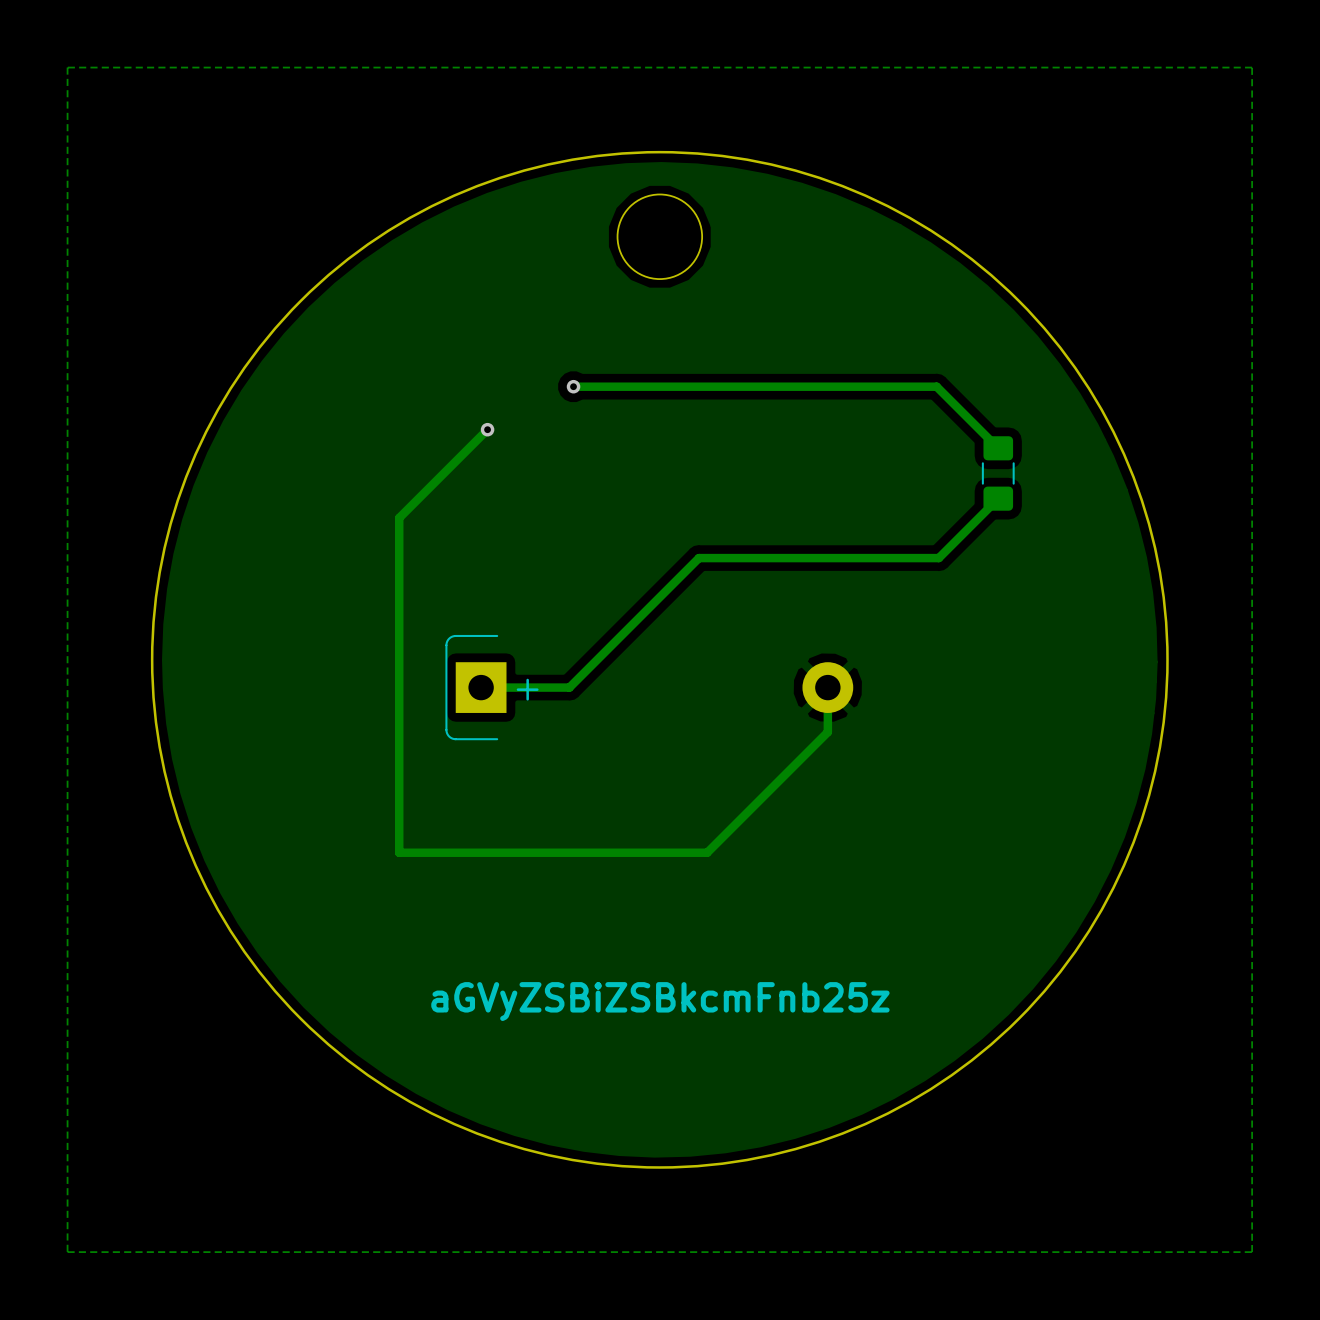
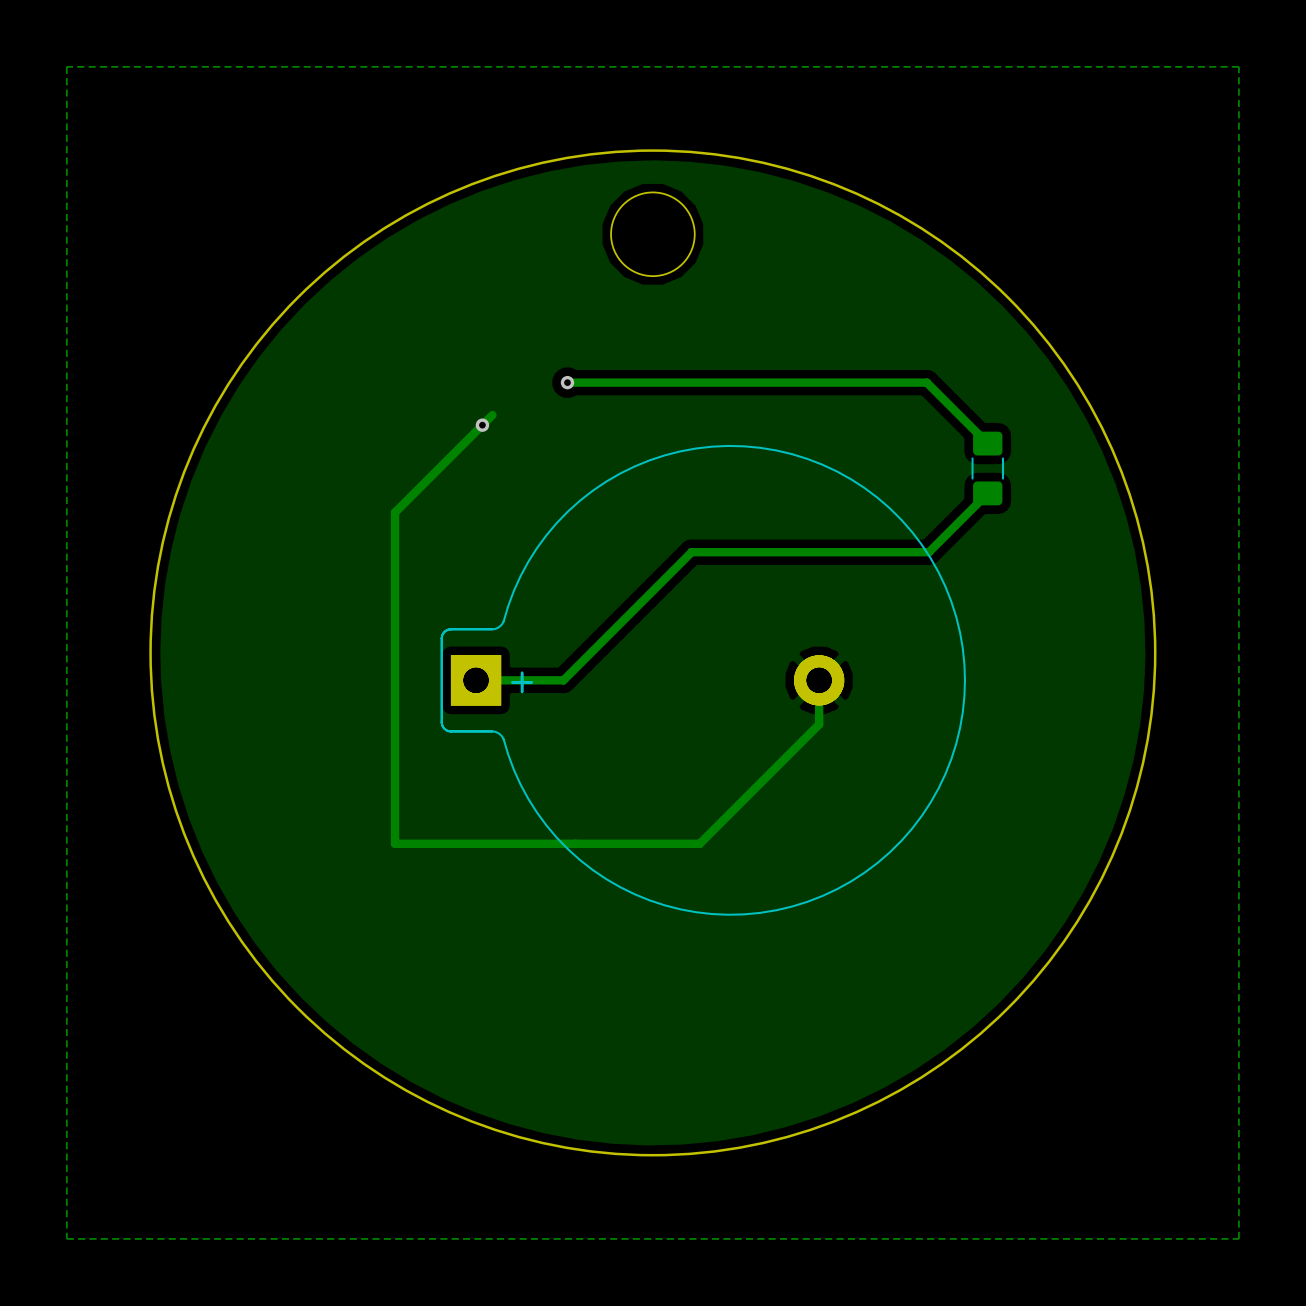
track: none -> (492, 415) (482, 425)
part: none -> (703, 680)
text: aGVyZSBiZSBkcmFnb25z (660, 1001) -> none

